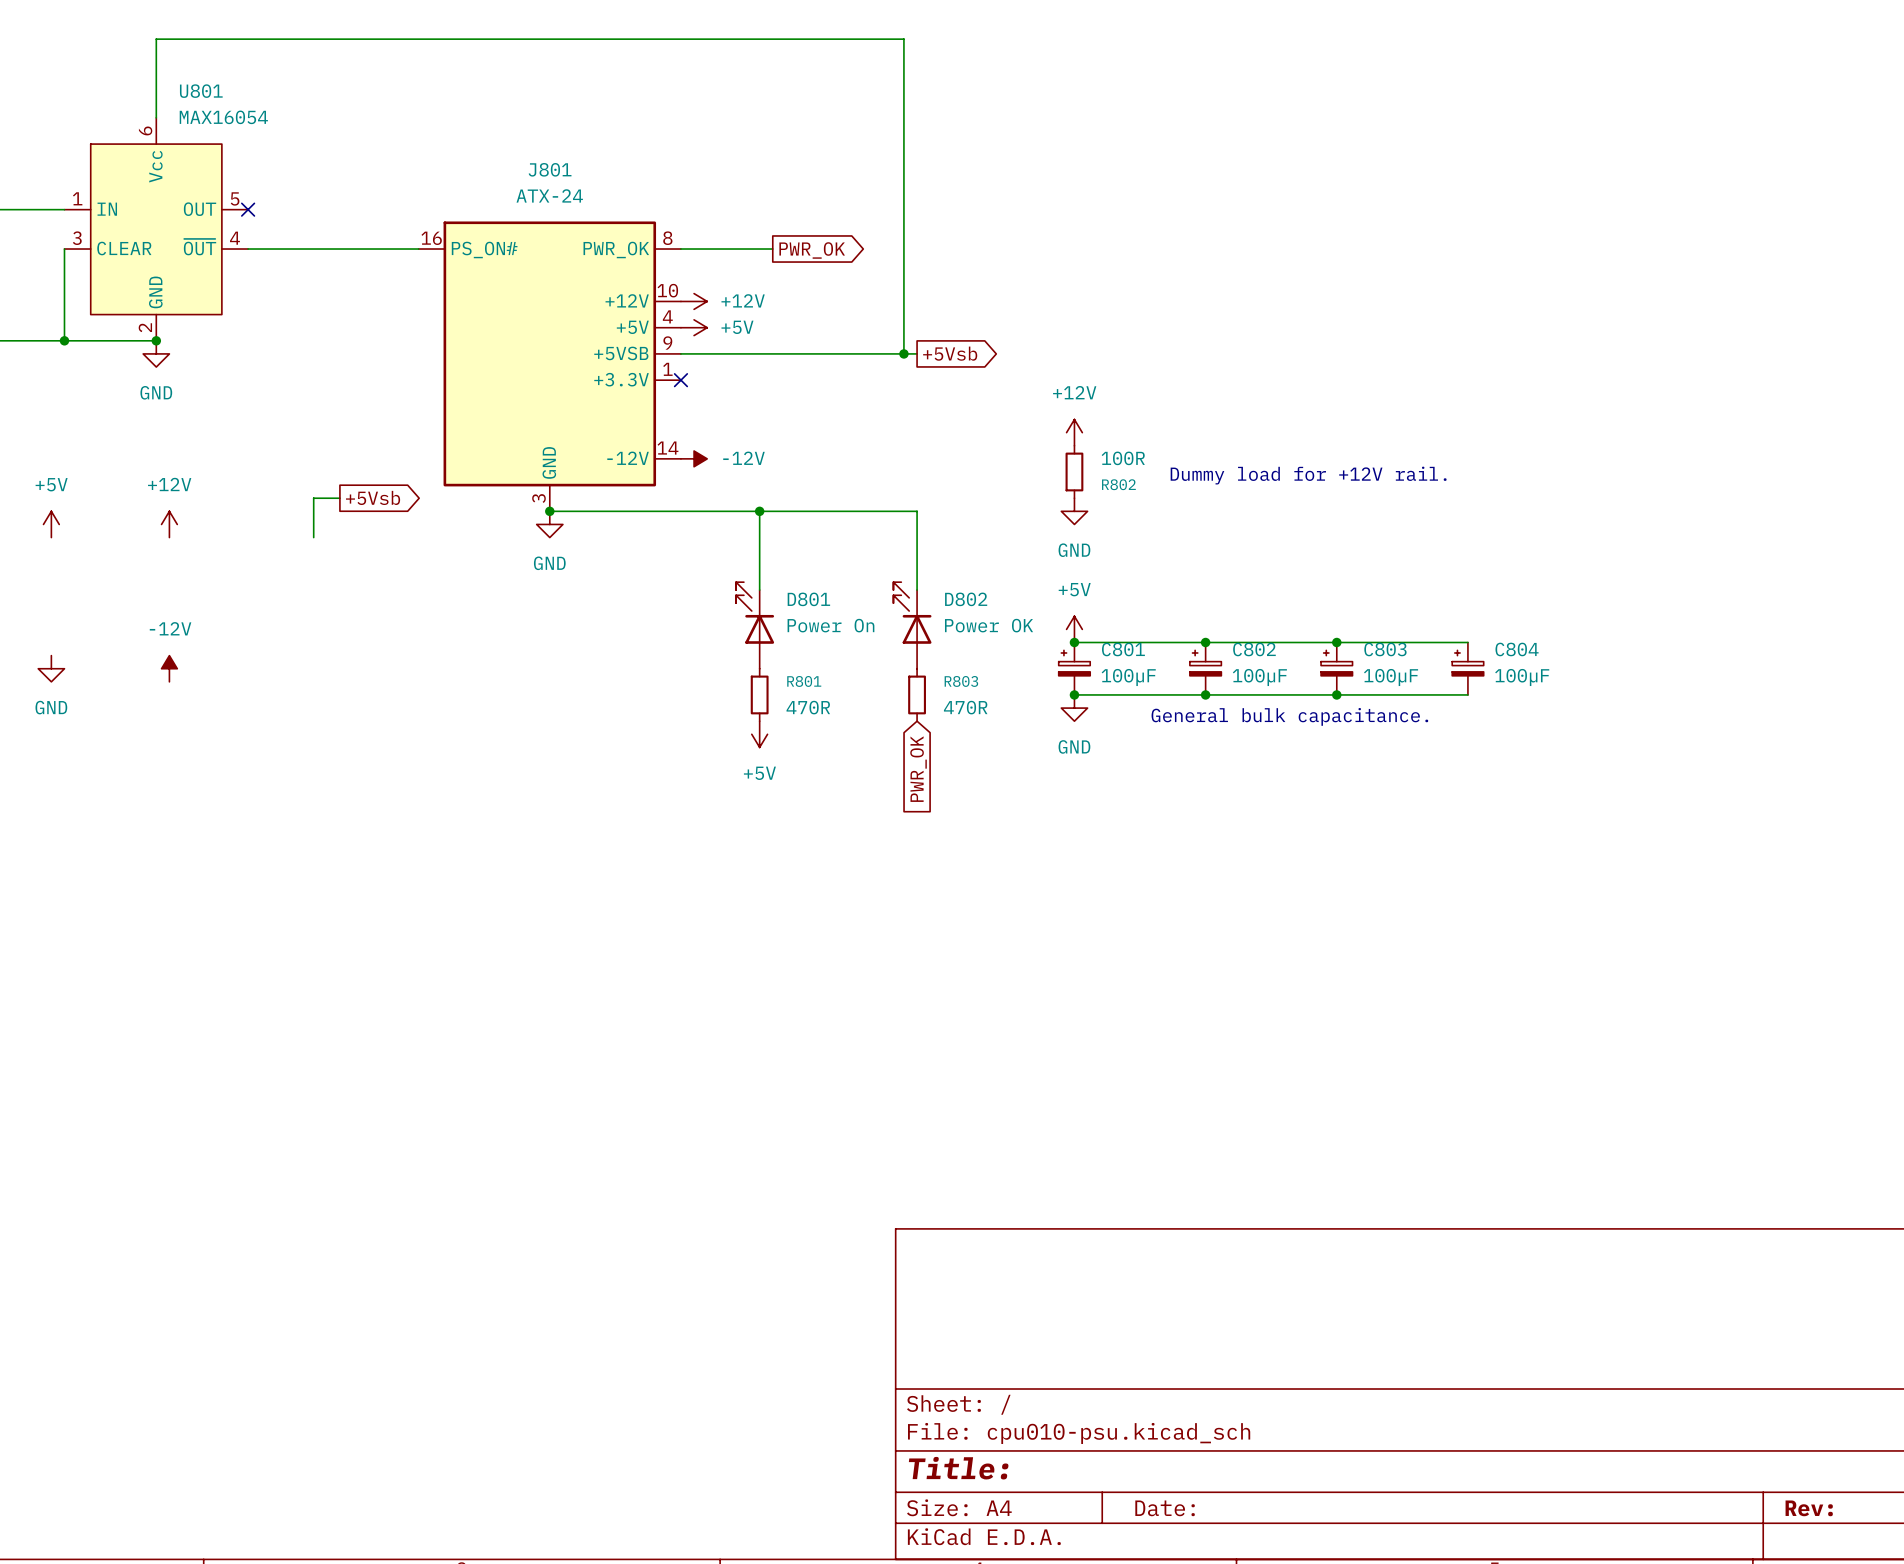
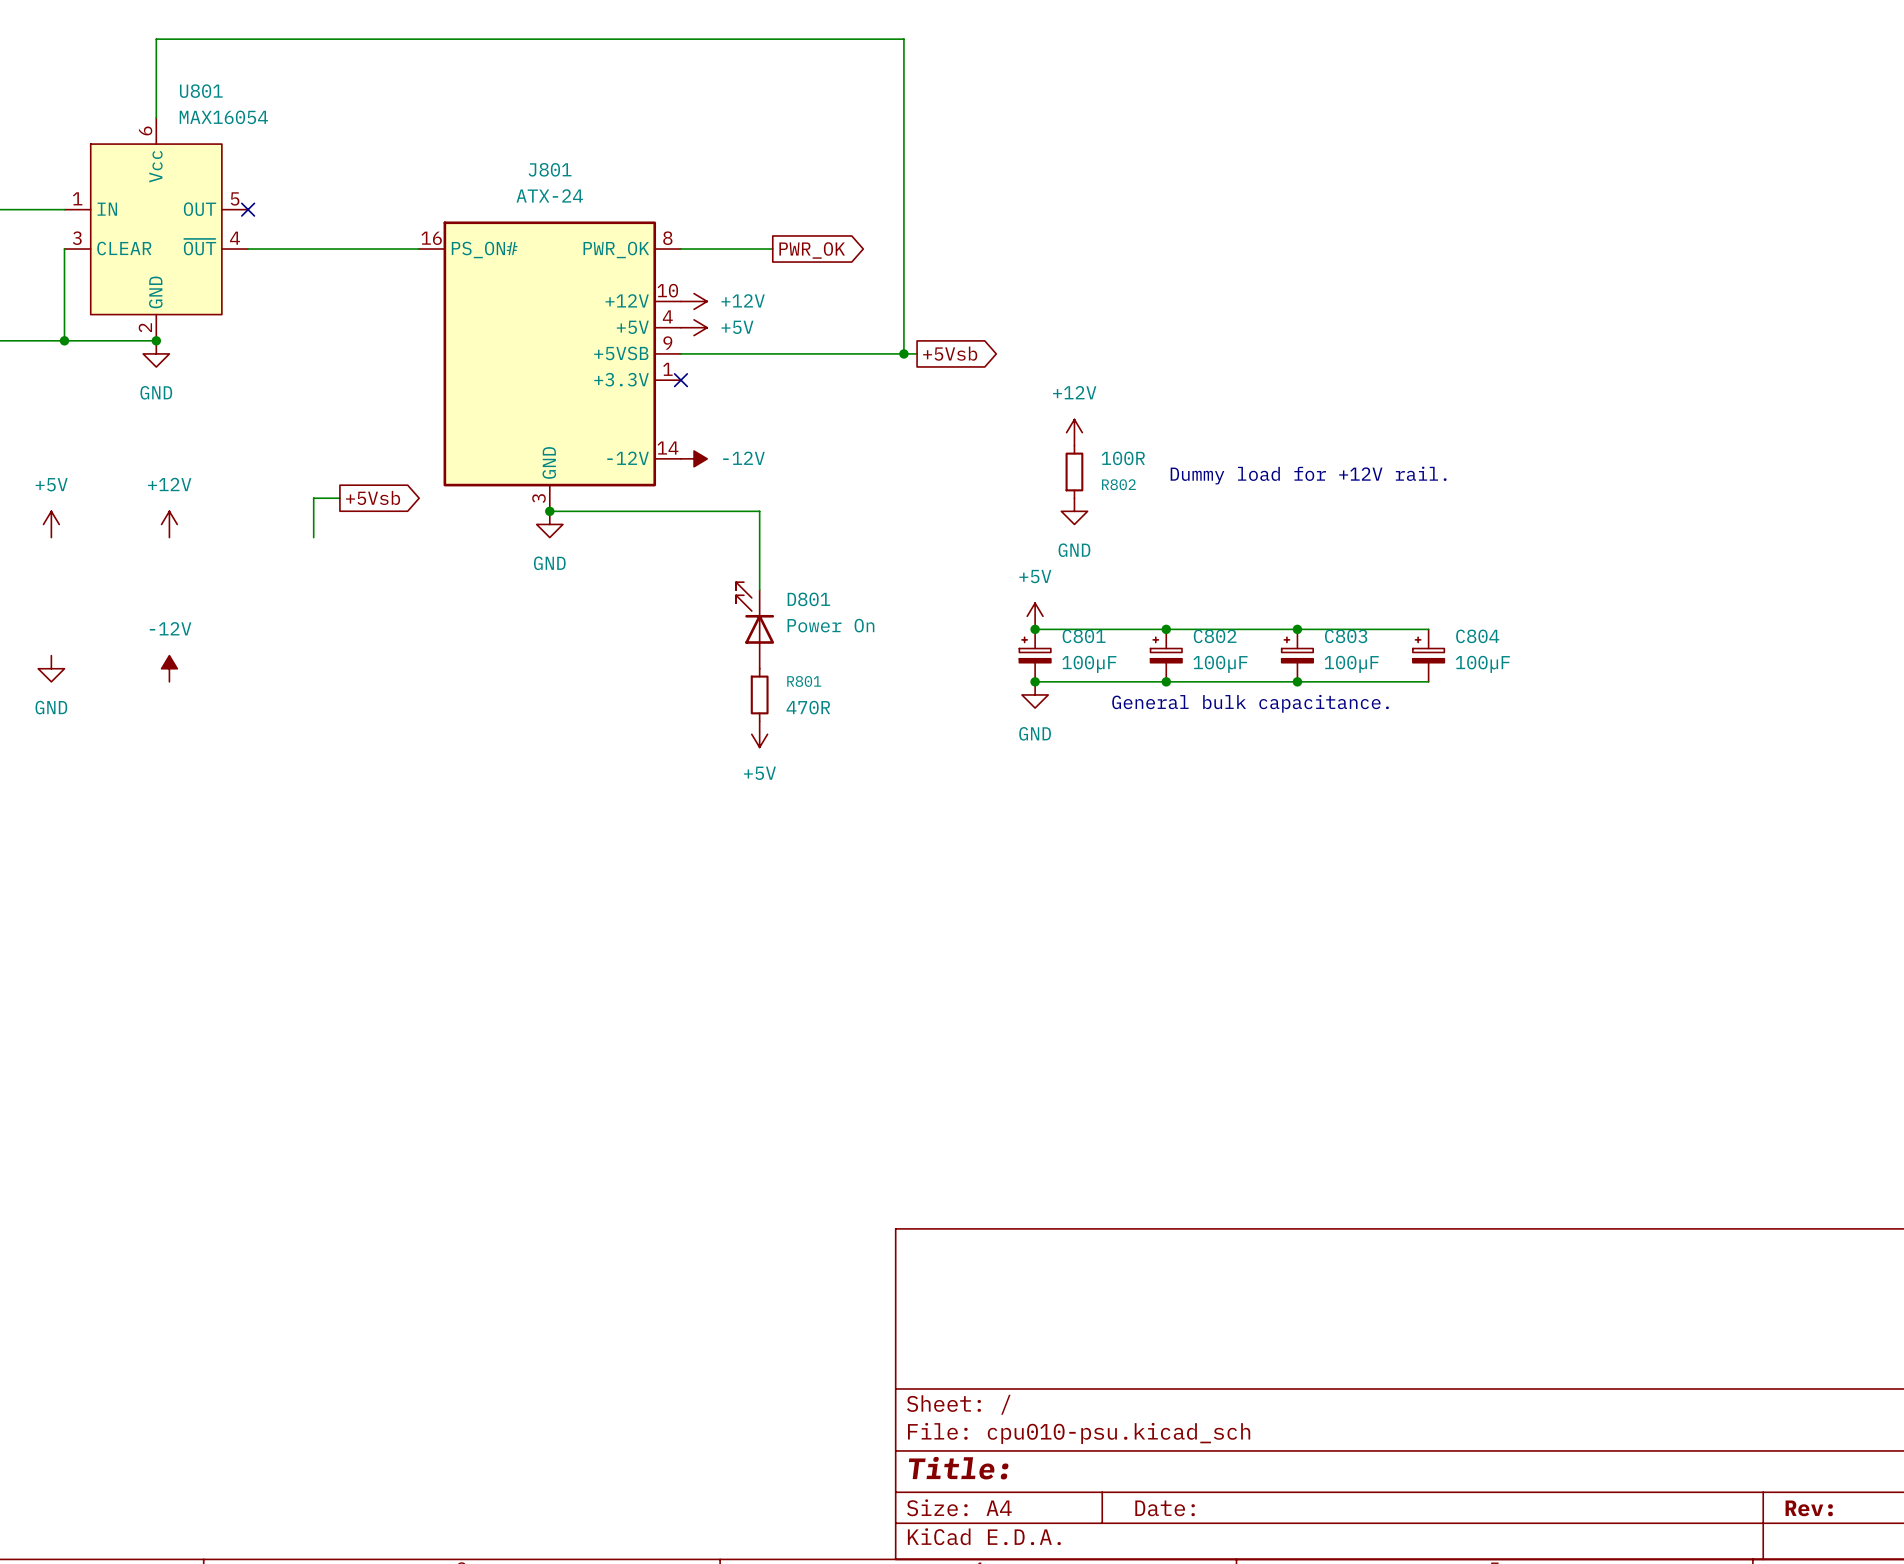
wire: (759, 511) (917, 511) (917, 590) -> none
junction: (759, 511) -> none
D802: Power OK (912, 625) -> none
junction: none -> (1035, 629)
power symbol position: +5V (1074, 629) -> +5V (1035, 616)
junction: none -> (1166, 629)
junction: none -> (1297, 629)
wire: (1074, 642) (1467, 642) -> (1035, 629) (1428, 629)
junction: (1074, 642) -> none
junction: (1205, 642) -> none
junction: (1336, 642) -> none
C801 position: (1074, 668) -> (1035, 655)
C802 position: (1205, 668) -> (1166, 655)
C803 position: (1336, 668) -> (1297, 655)
C804 position: (1467, 668) -> (1428, 655)
junction: none -> (1035, 681)
junction: none -> (1166, 681)
junction: none -> (1297, 681)
R803: 470R (917, 694) -> none
wire: (1074, 694) (1467, 694) -> (1035, 681) (1428, 681)
junction: (1074, 694) -> none
junction: (1205, 694) -> none
junction: (1336, 694) -> none
power symbol position: GND (1074, 708) -> GND (1035, 694)
text position: General bulk capacitance. (1289, 716) -> General bulk capacitance. (1250, 703)
global label: PWR_OK (918, 769) -> none

